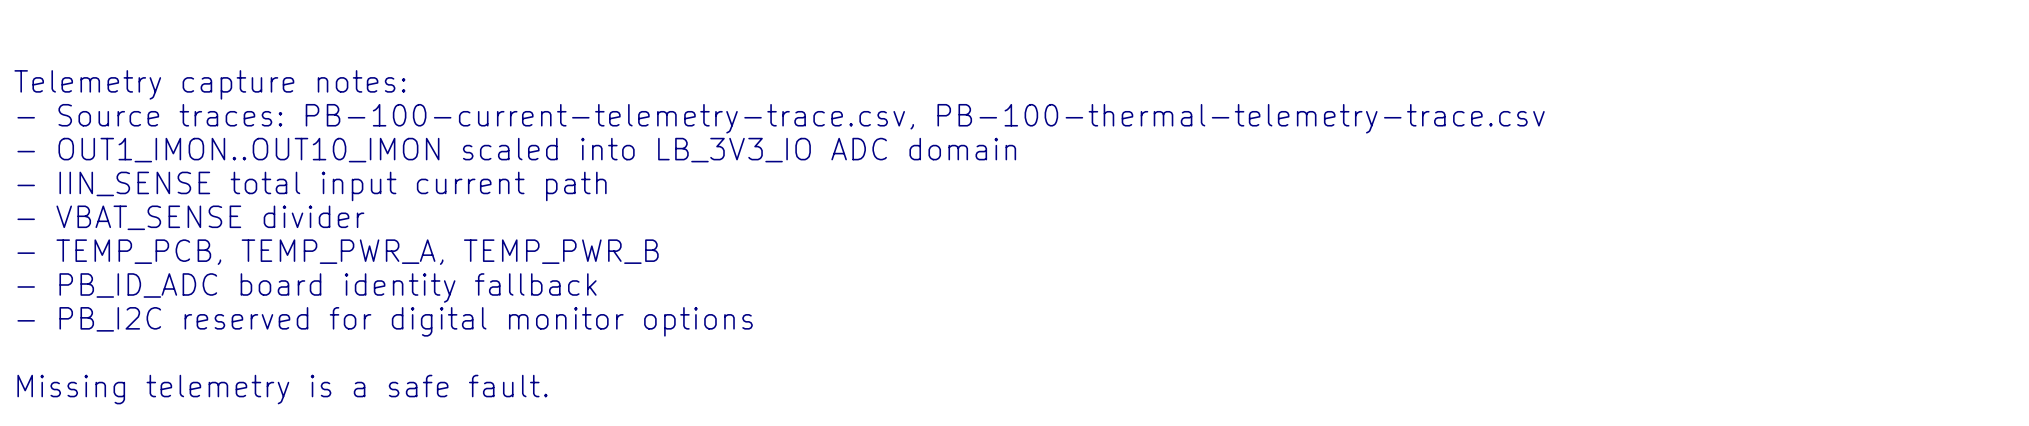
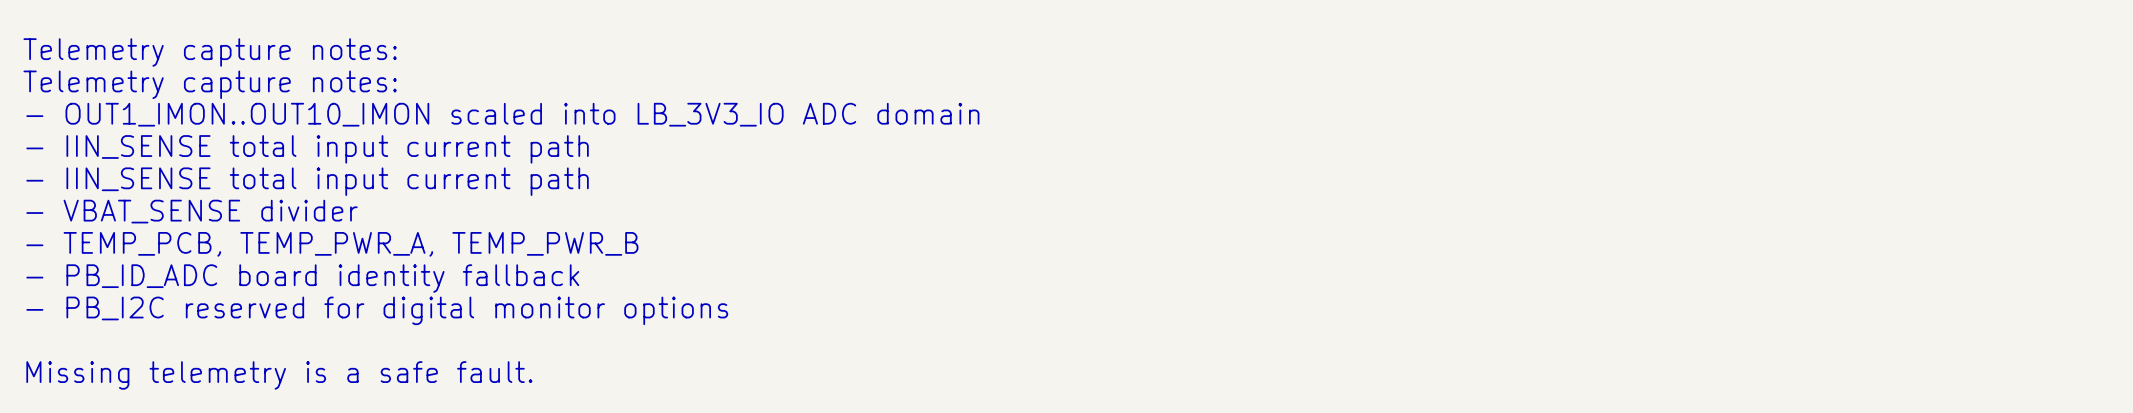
text: none -> Telemetry capture notes: (210, 52)
text: - Source traces: PB-100-current-telemetry-trace.csv, PB-100-thermal-telemetry-trace.csv (781, 118) -> - OUT1_IMON..OUT10_IMON scaled into LB_3V3_IO ADC domain (502, 114)
text: - OUT1_IMON..OUT10_IMON scaled into LB_3V3_IO ADC domain (516, 150) -> - IIN_SENSE total input current path (307, 149)

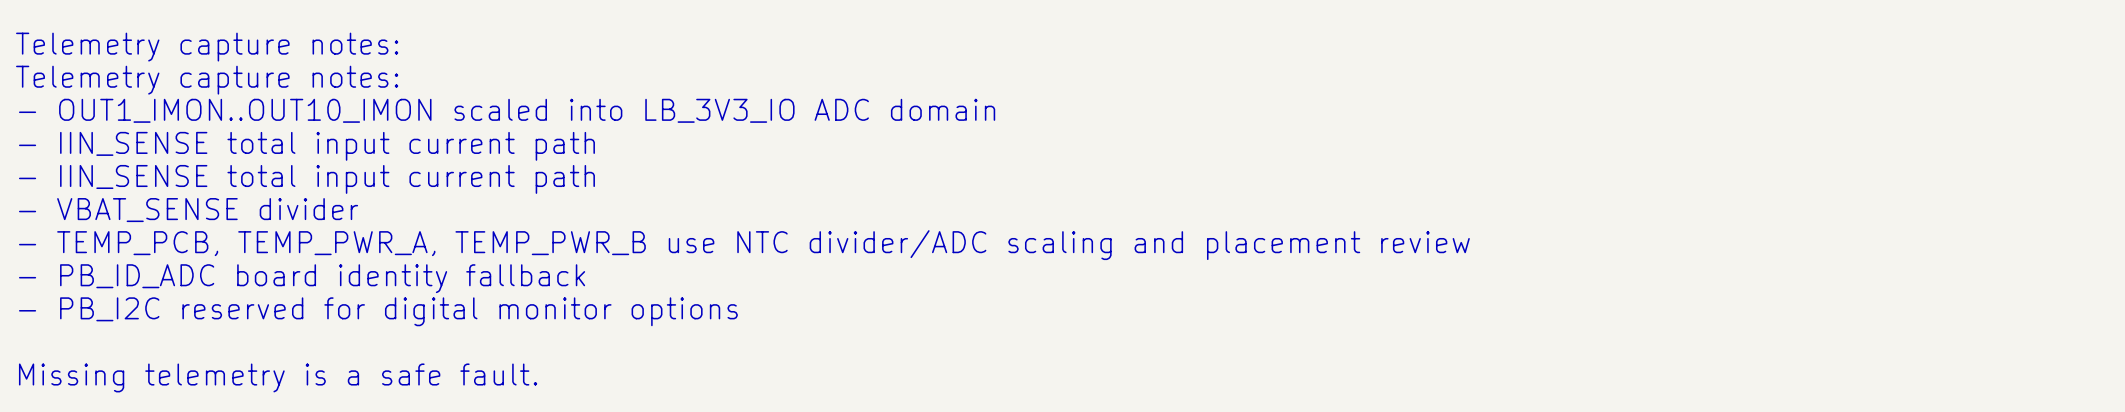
text: - TEMP_PCB, TEMP_PWR_A, TEMP_PWR_B (332, 244) -> - TEMP_PCB, TEMP_PWR_A, TEMP_PWR_B use NTC divider/ADC scaling and placement review (744, 245)

